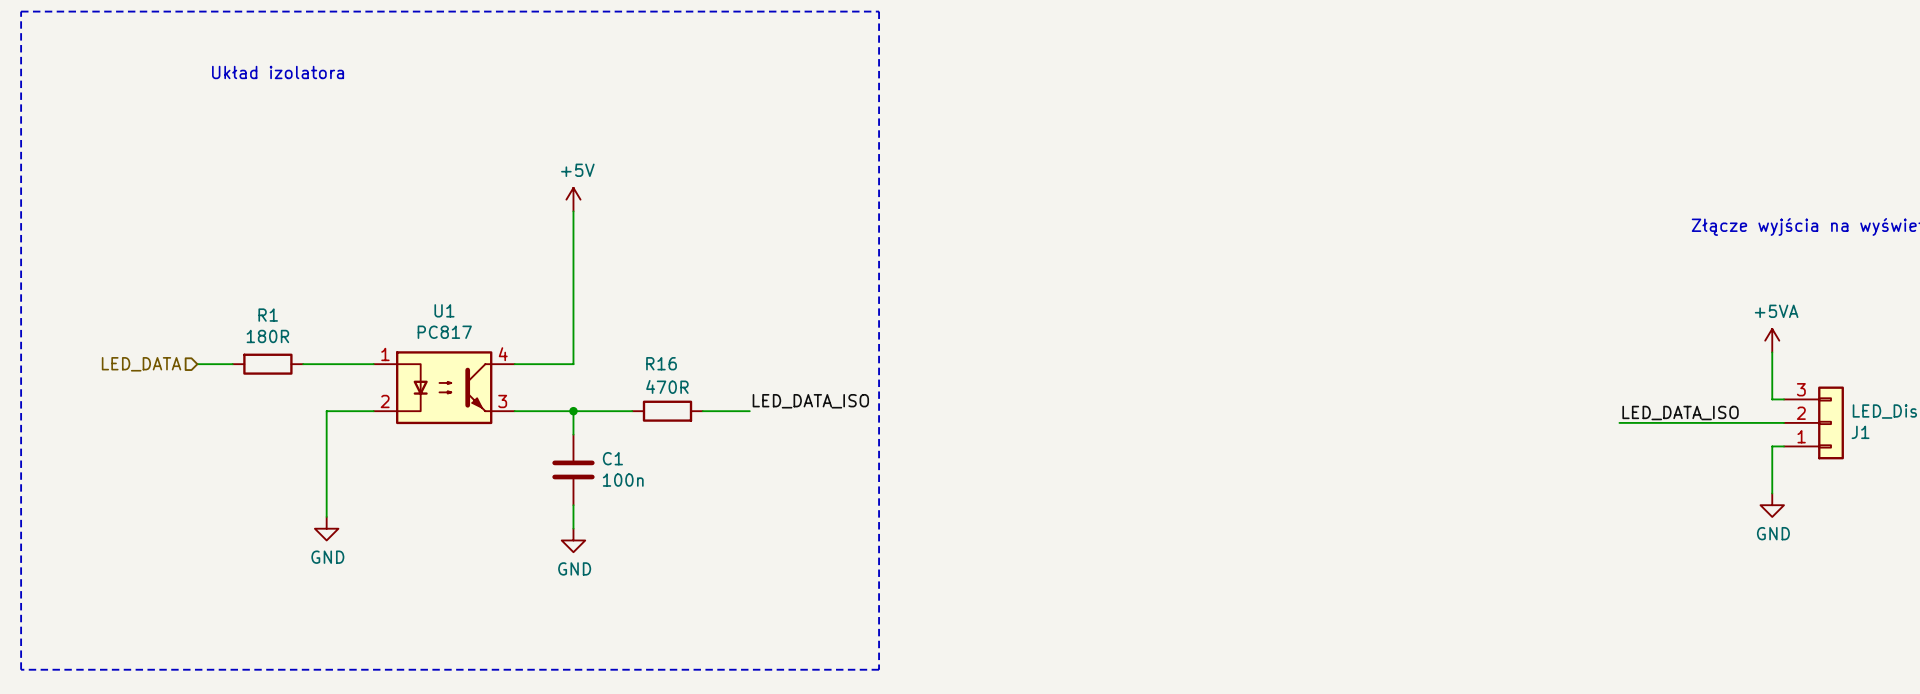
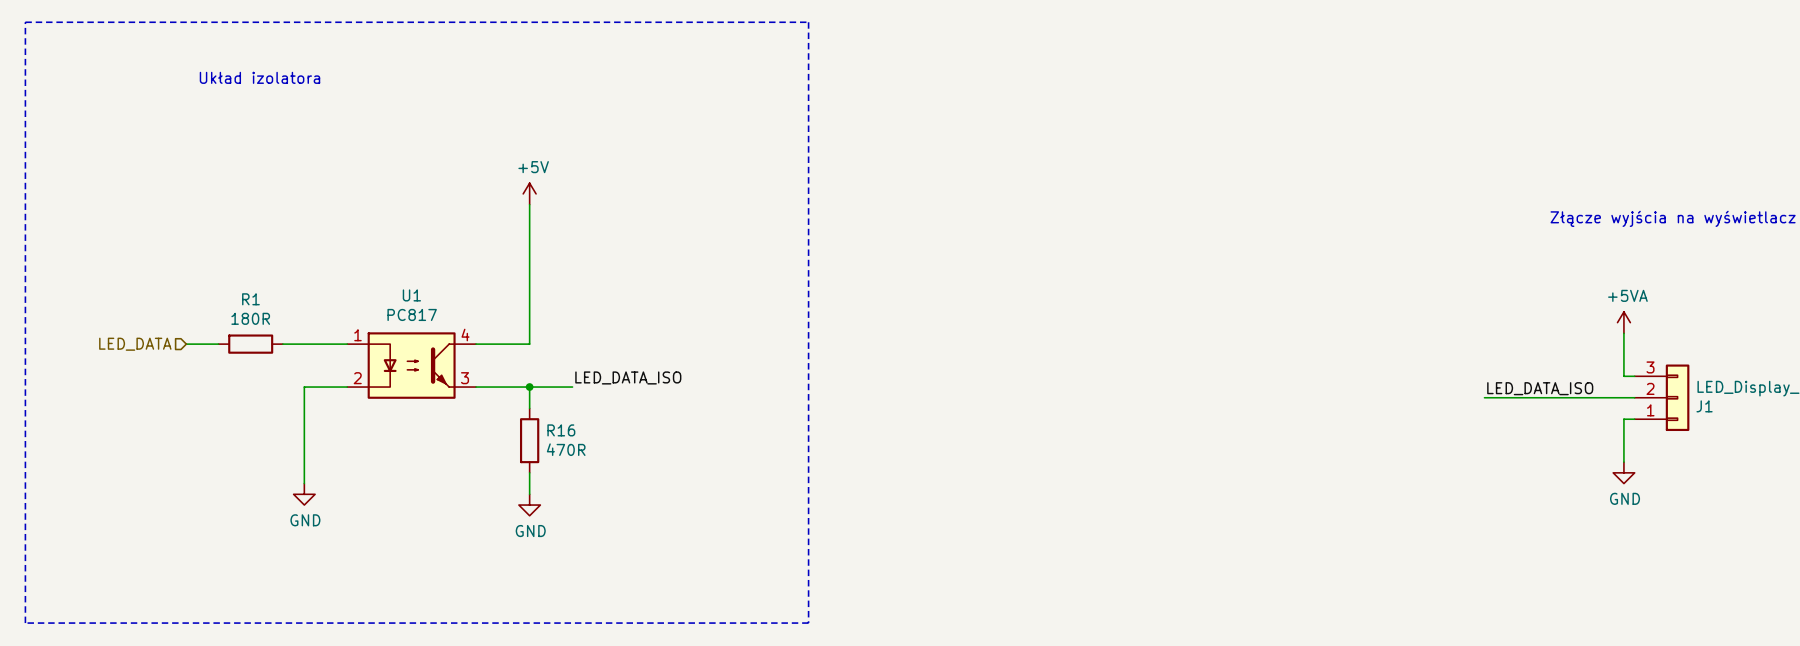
R16 value position: 470R (667, 386) -> 470R (566, 449)
label position: LED_DATA_ISO (810, 401) -> LED_DATA_ISO (628, 377)
wire: (620, 411) (632, 411) -> none
R16 rotation: 0° (667, 411) -> 90° clockwise (529, 440)
R16 position: (667, 411) -> (529, 440)
wire: (702, 411) (749, 411) -> none
C1: 100n (573, 469) -> none

